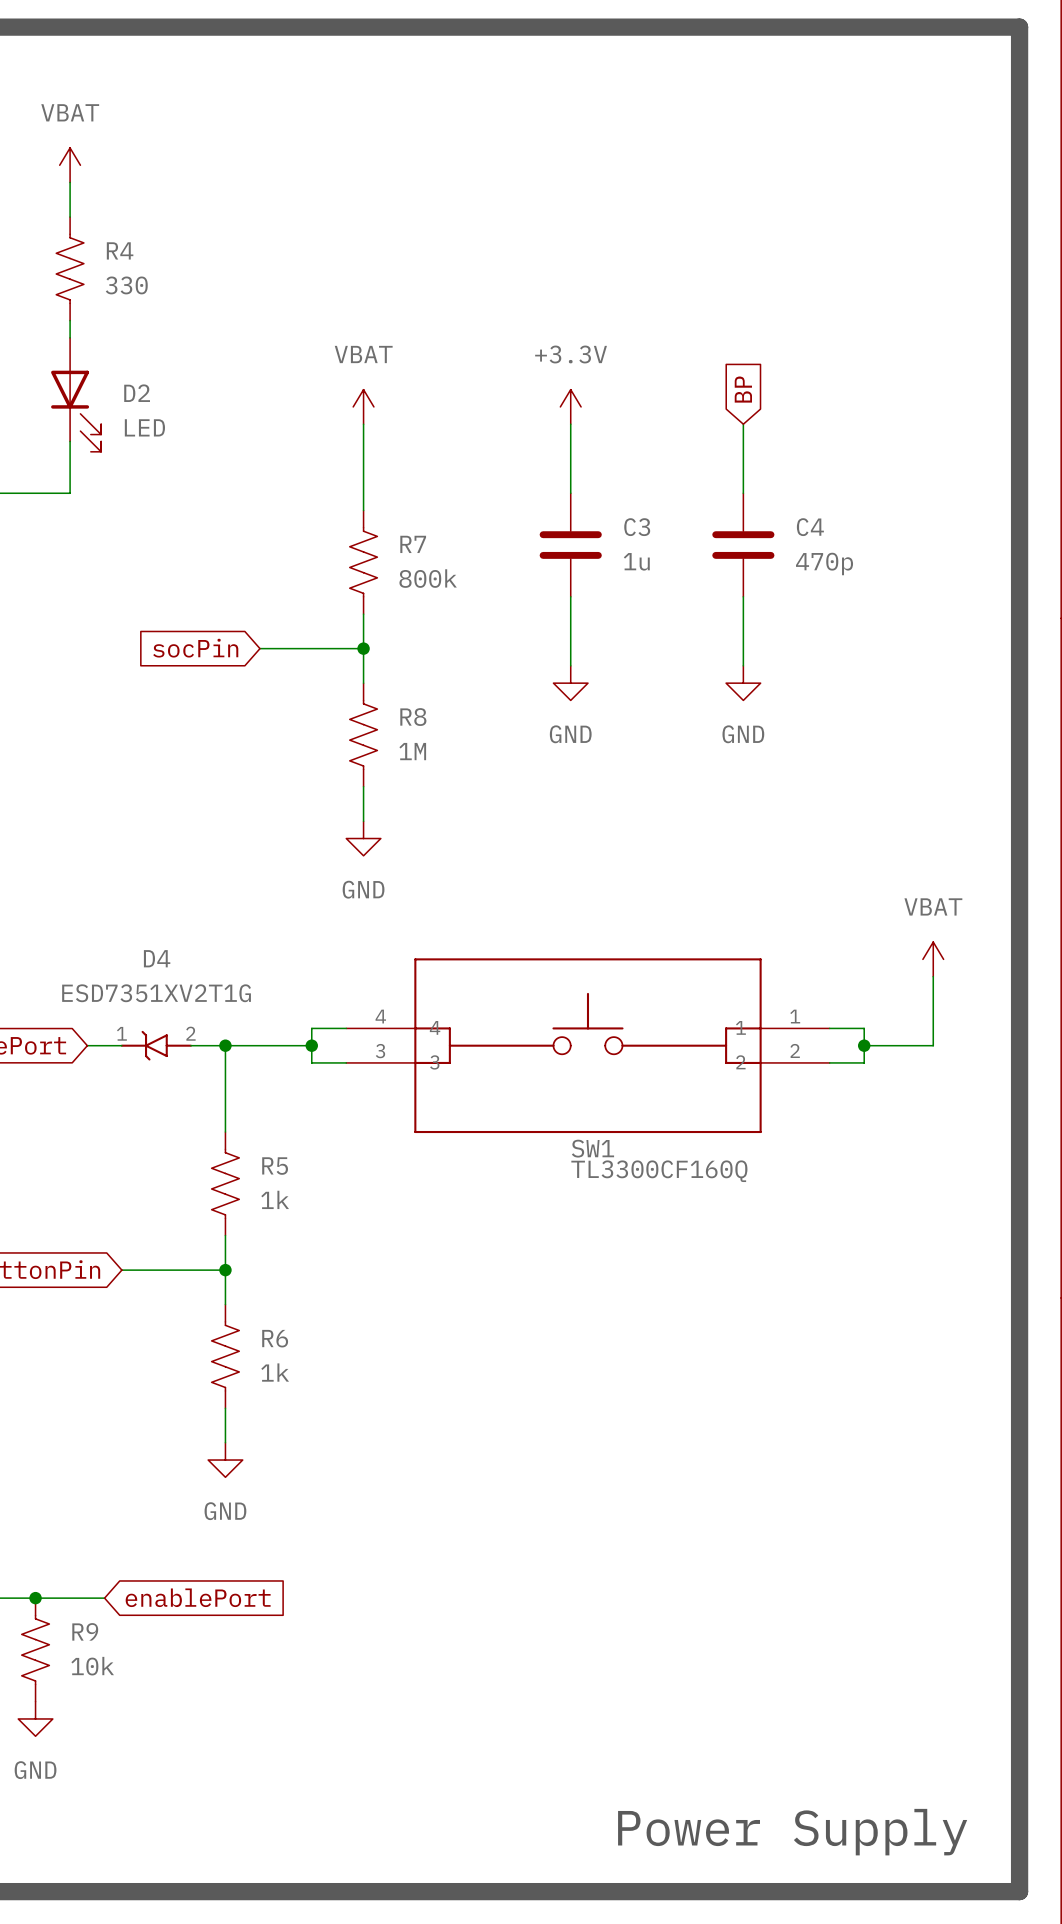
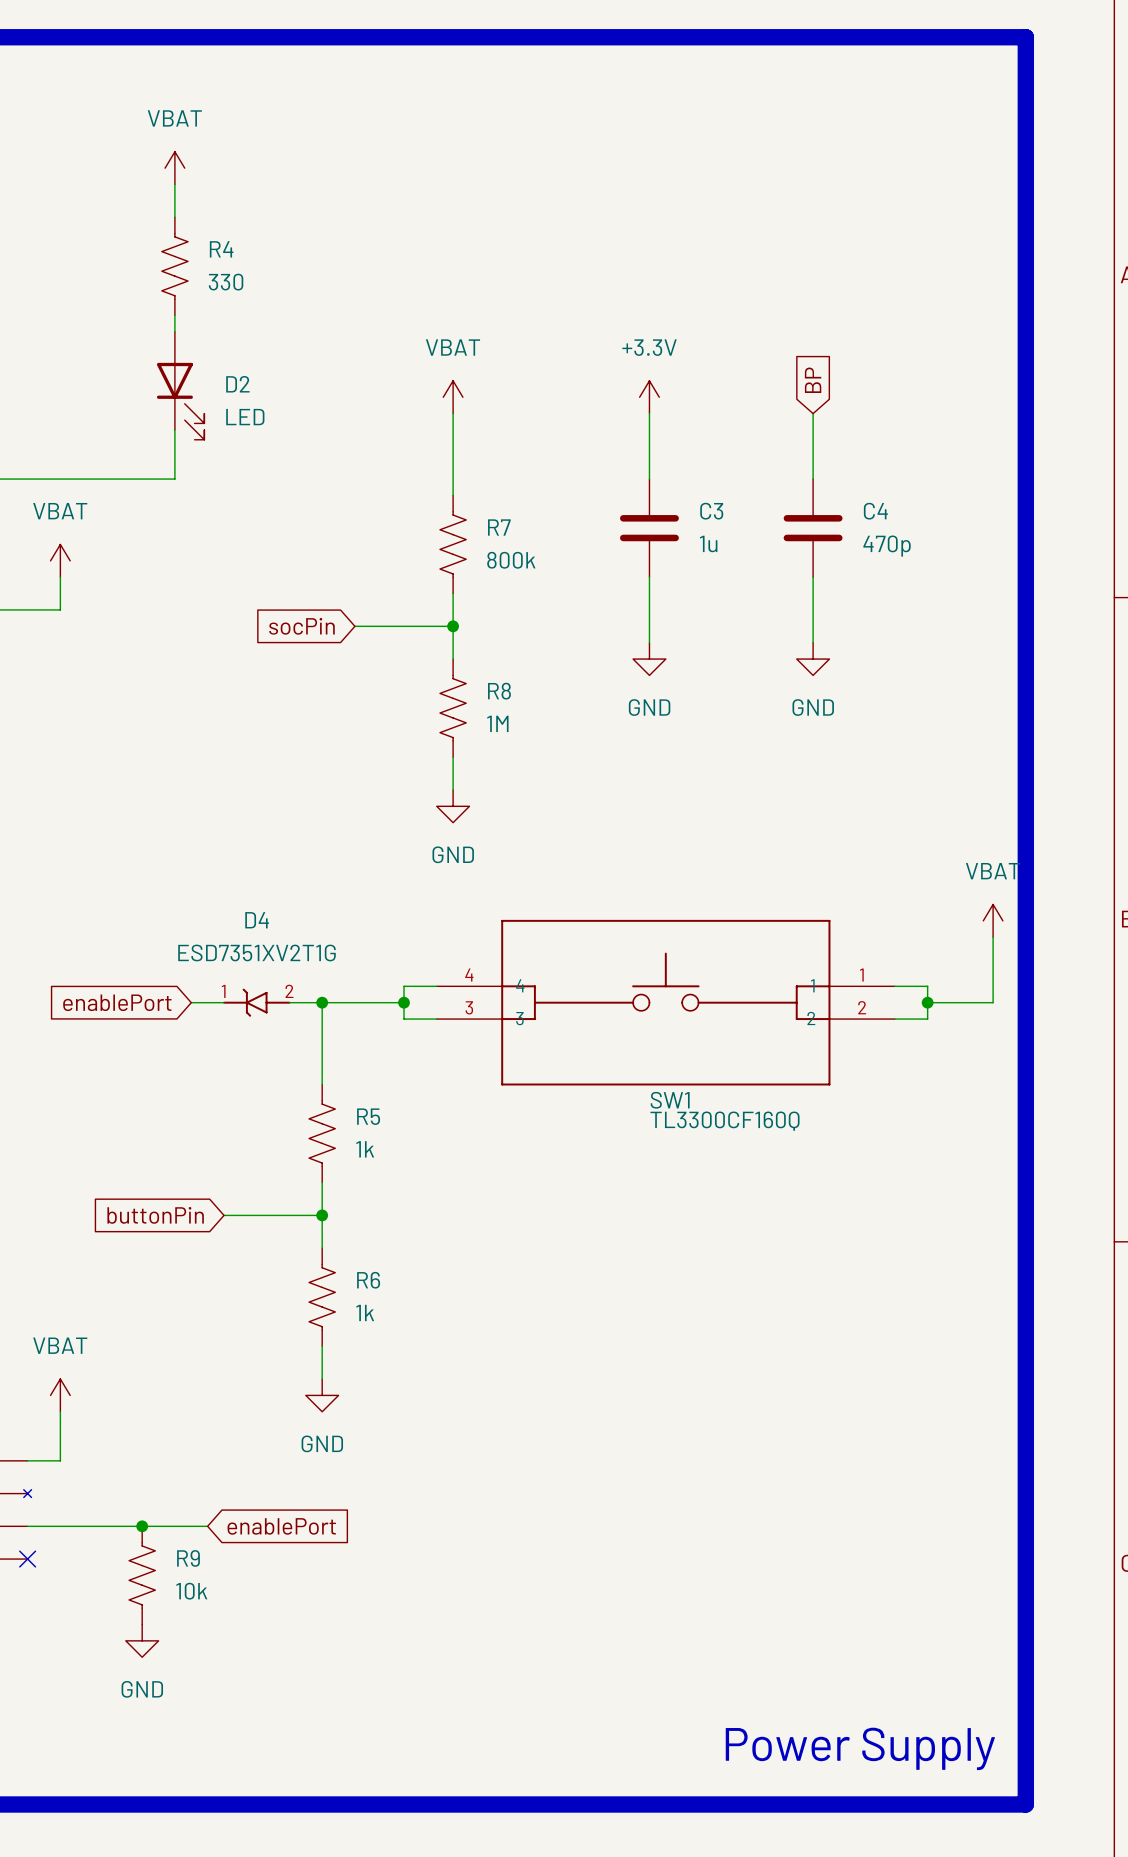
line: (967, 27) (1019, 27) (1019, 1891) (967, 1891) -> (1025, 37) (1025, 1804)

